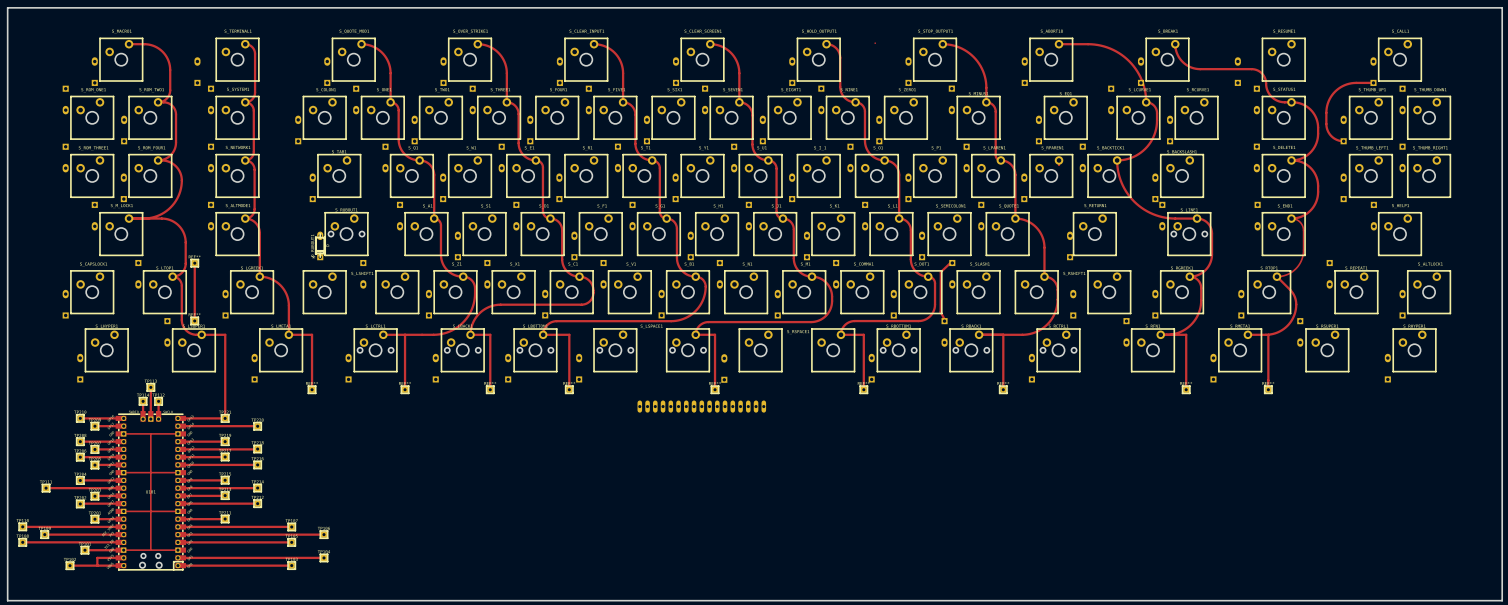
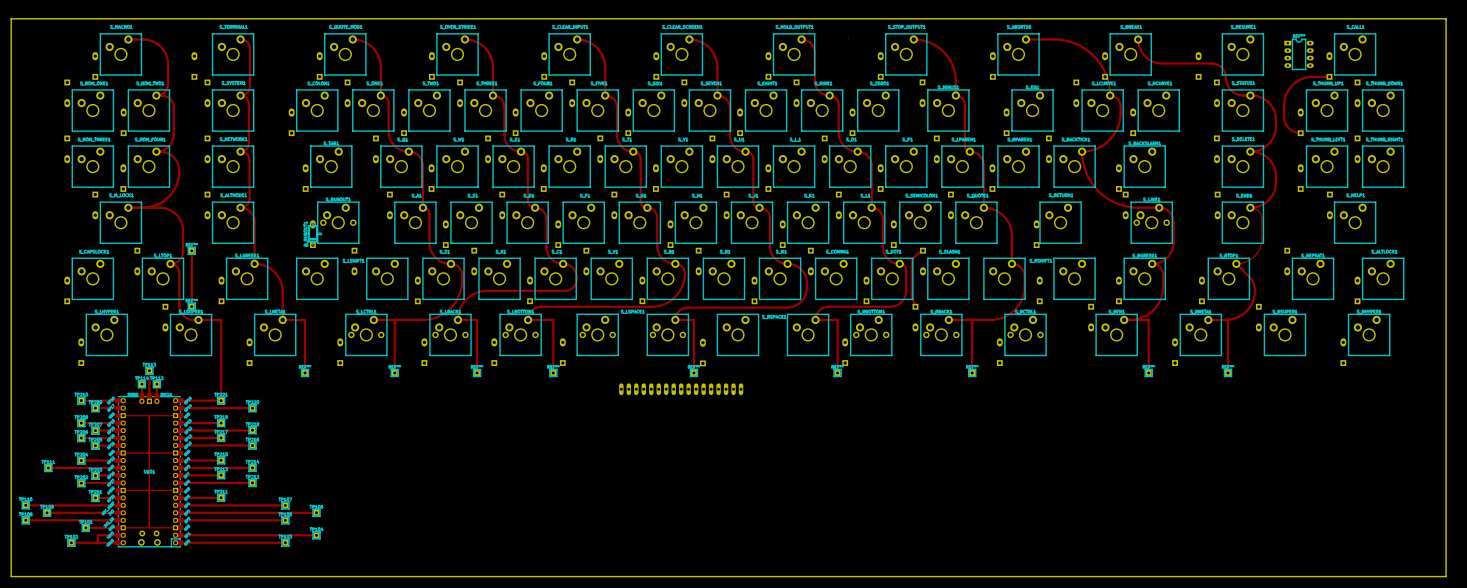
board edge: (7, 22) (7, 7) (1502, 7) (1502, 600) (1494, 600) -> (11, 18) (1446, 18) (1446, 576)
part: none -> (1299, 54)

